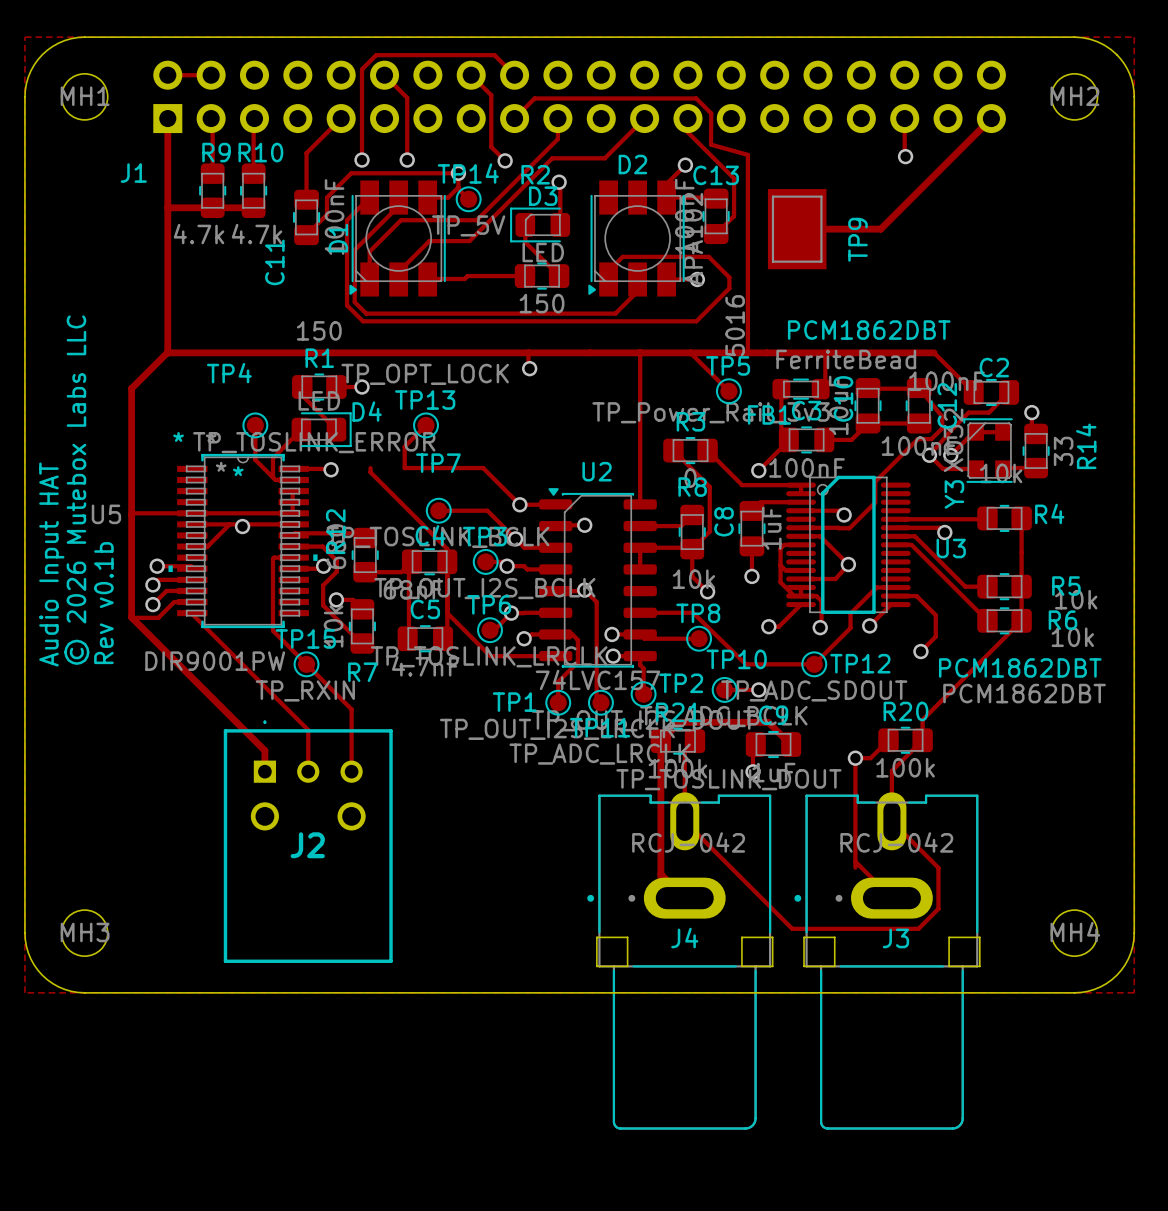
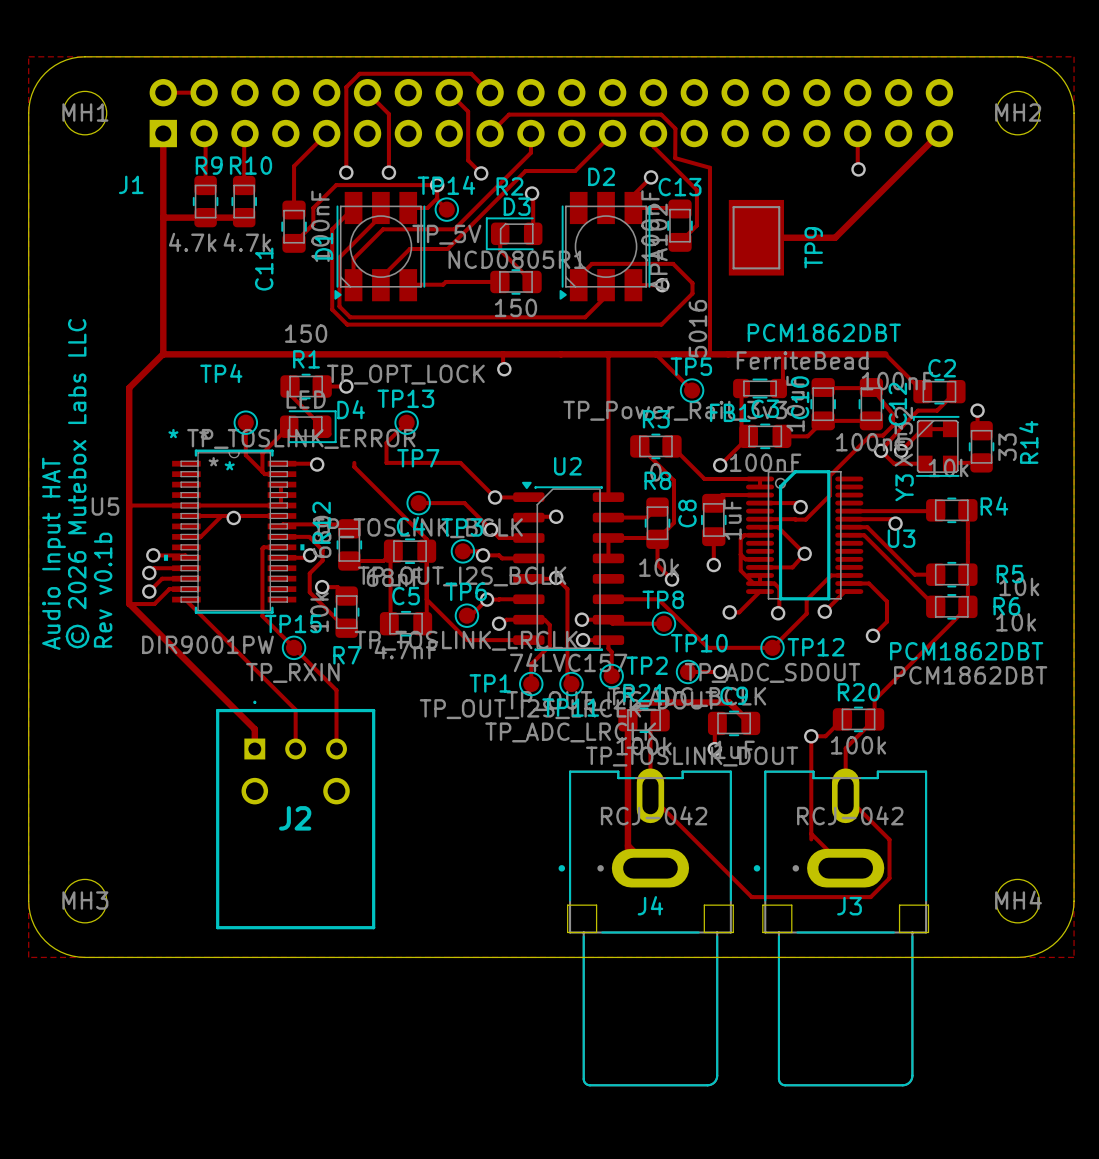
D3 value: LED (543, 252) -> NCD0805R1 (517, 259)

